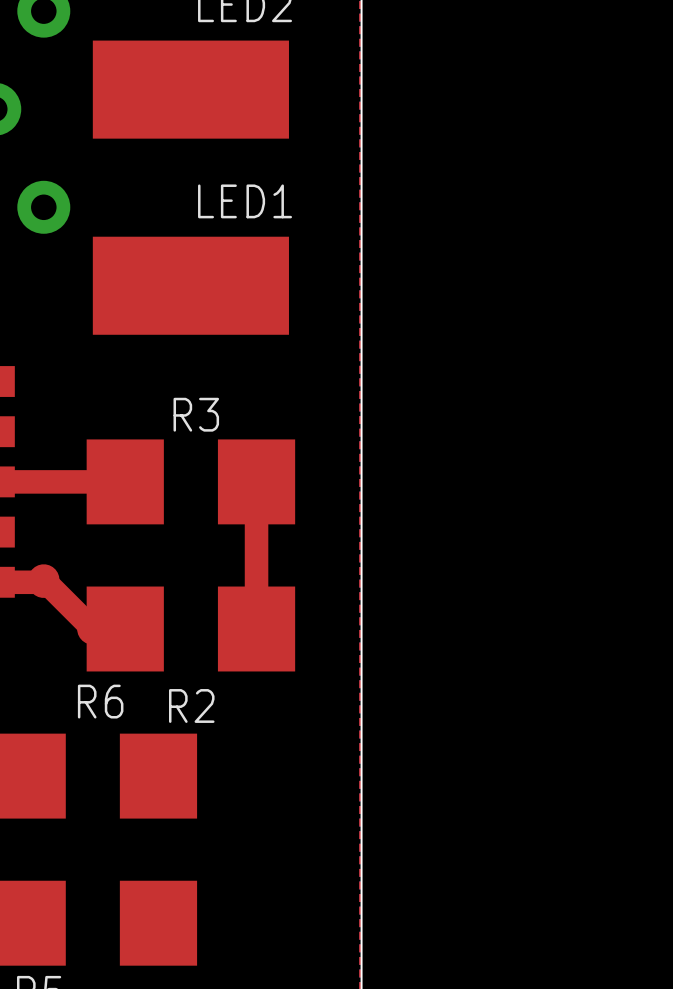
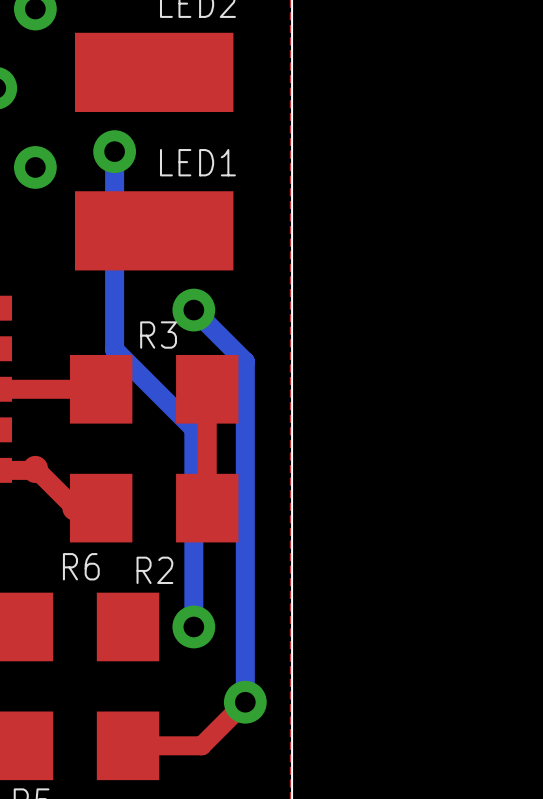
bottom track: none -> (114, 151) (114, 349) (193, 428) (193, 626)
via: none -> (114, 151)
bottom track: none -> (193, 310) (245, 361) (245, 702)
via: none -> (193, 310)
via: none -> (193, 626)
top track: none -> (245, 702) (201, 745) (128, 745)
via: none -> (245, 702)

